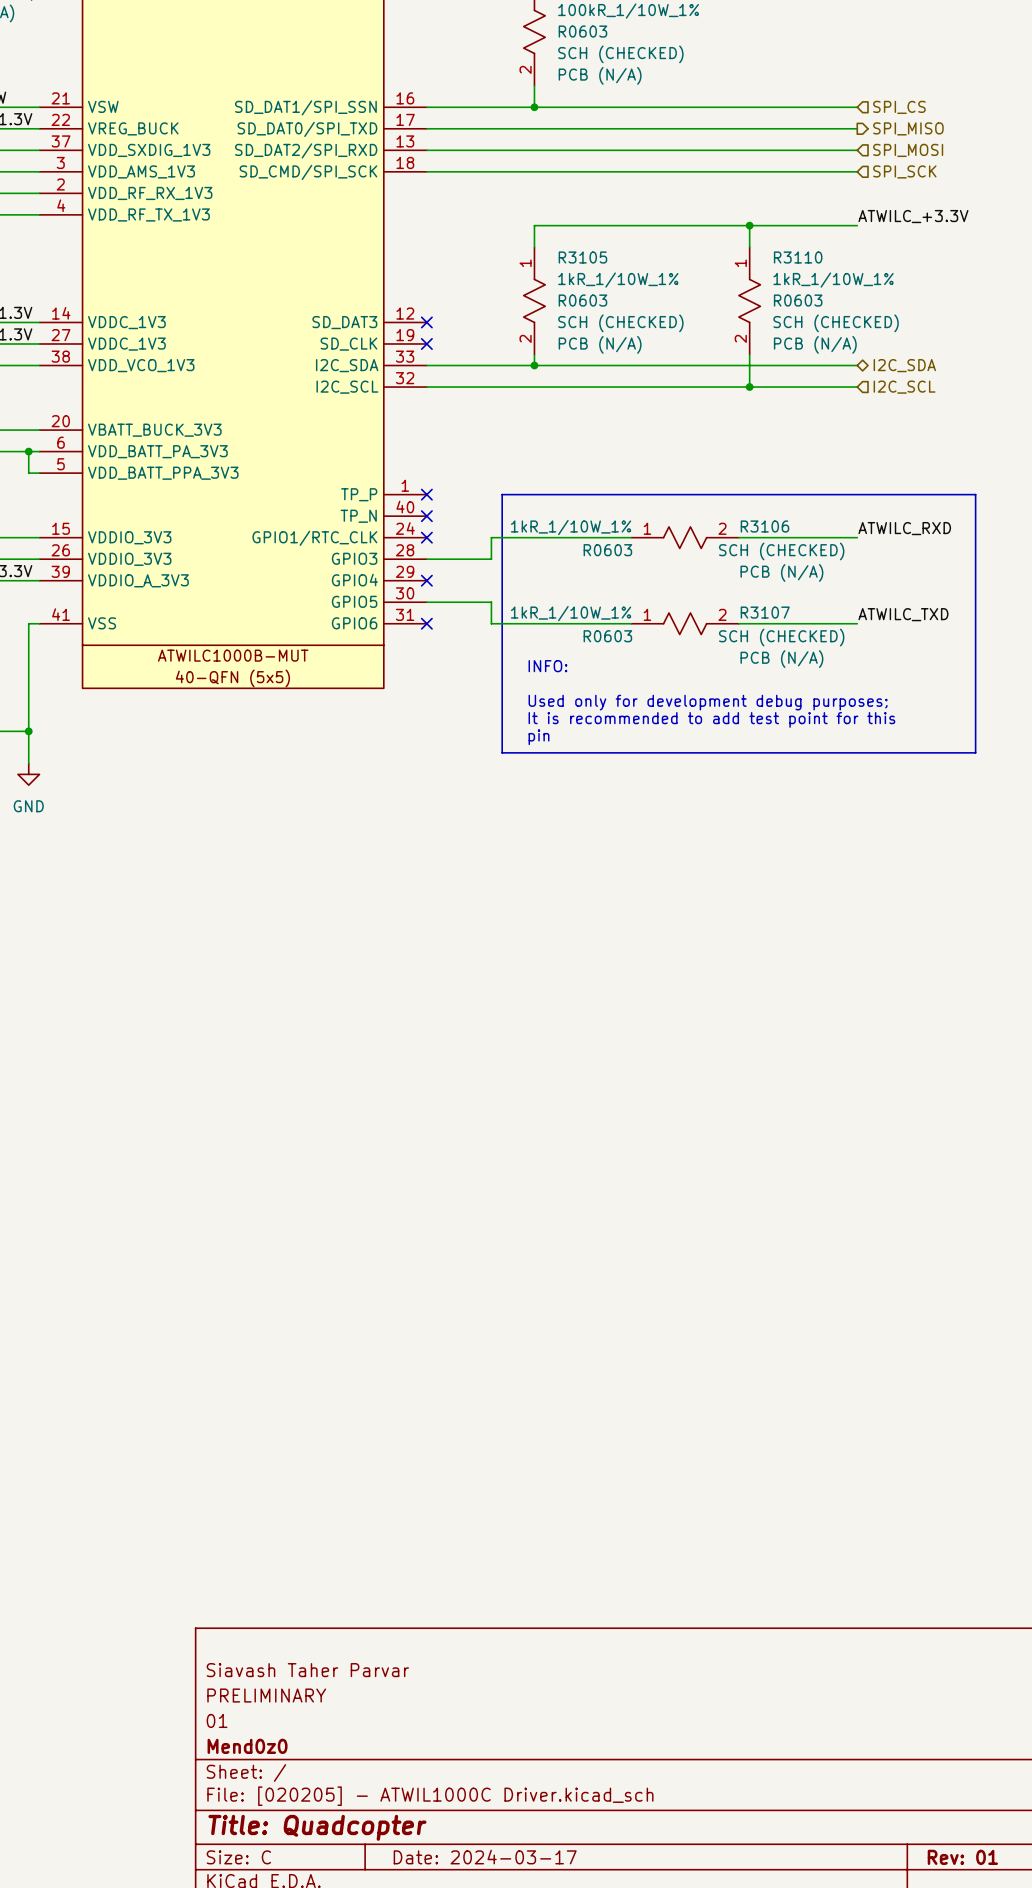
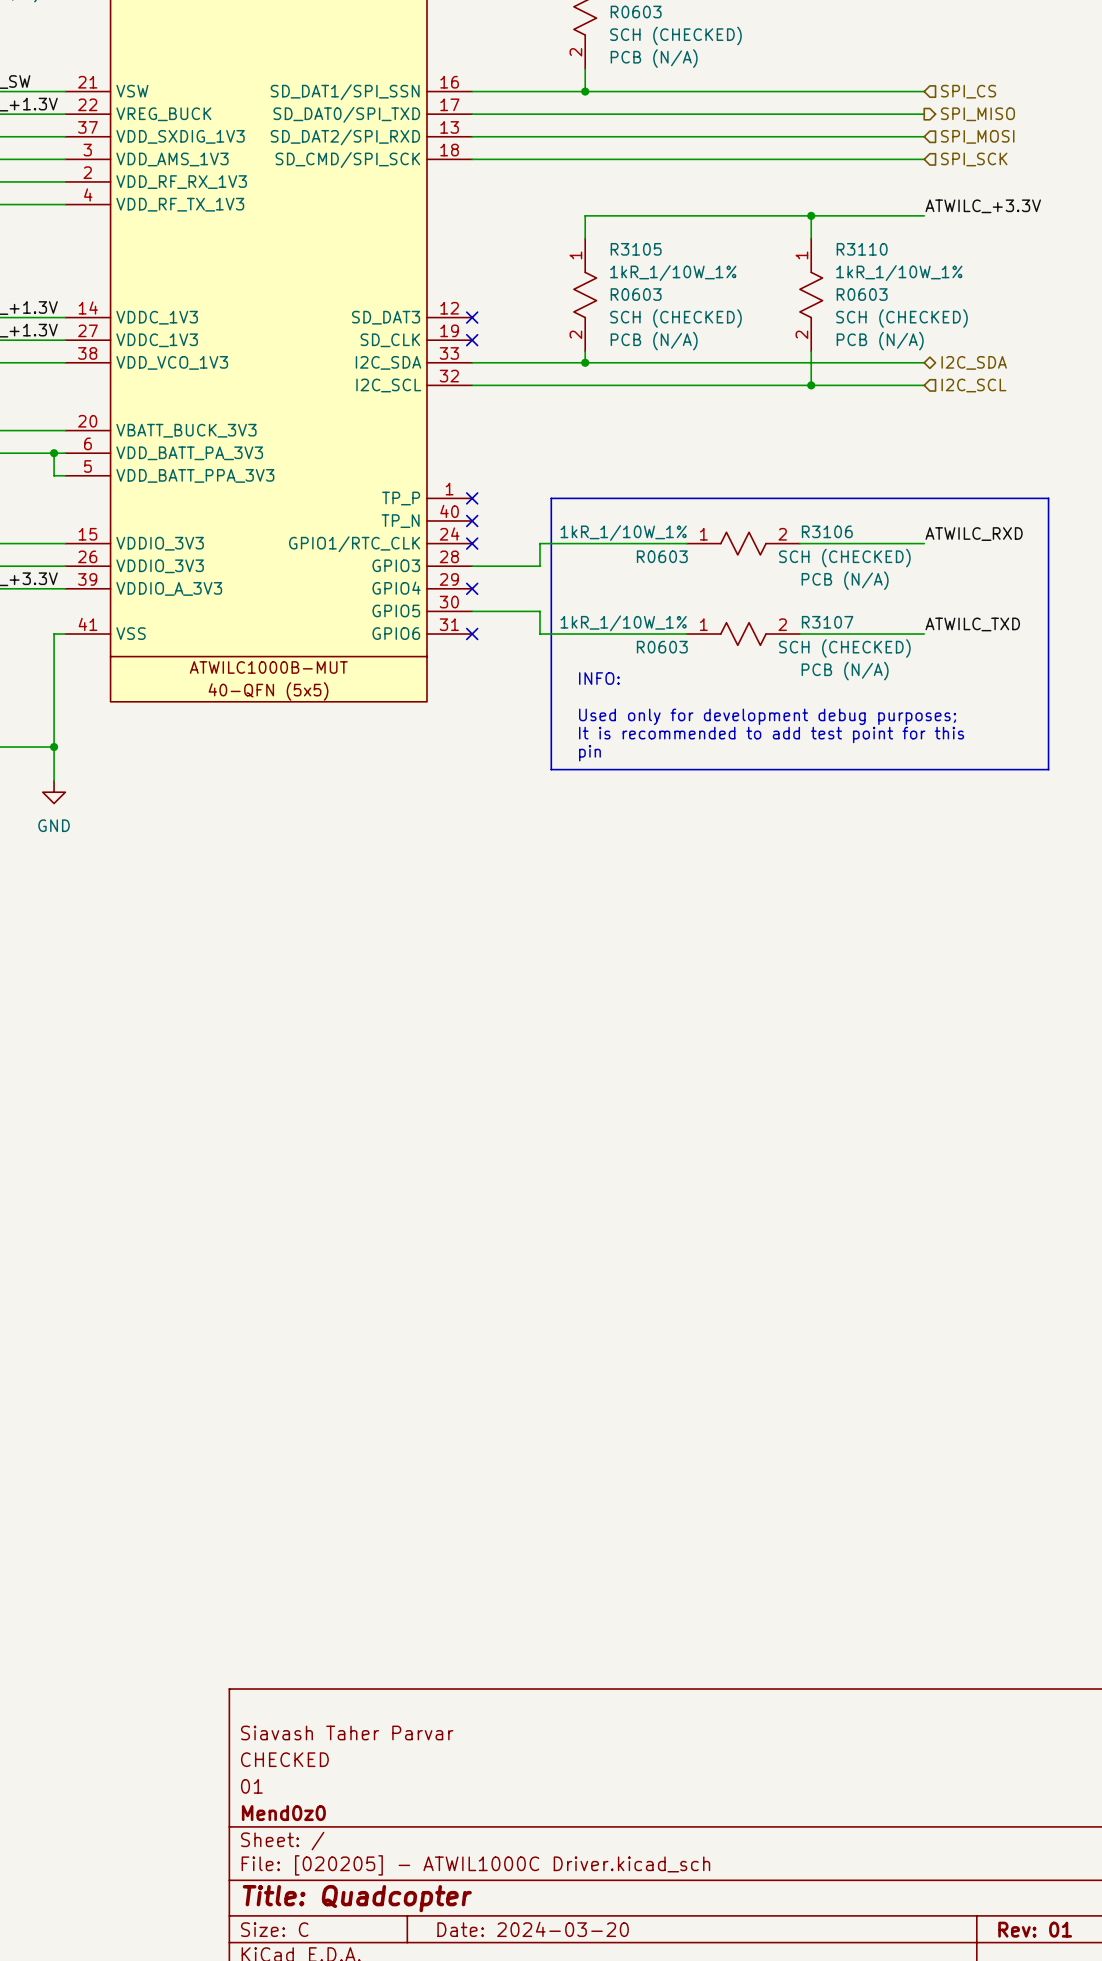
title block: PRELIMINARY (266, 1695) -> CHECKED (284, 1759)
title block: Date: 2024-03-17 (485, 1857) -> Date: 2024-03-20 (533, 1929)

